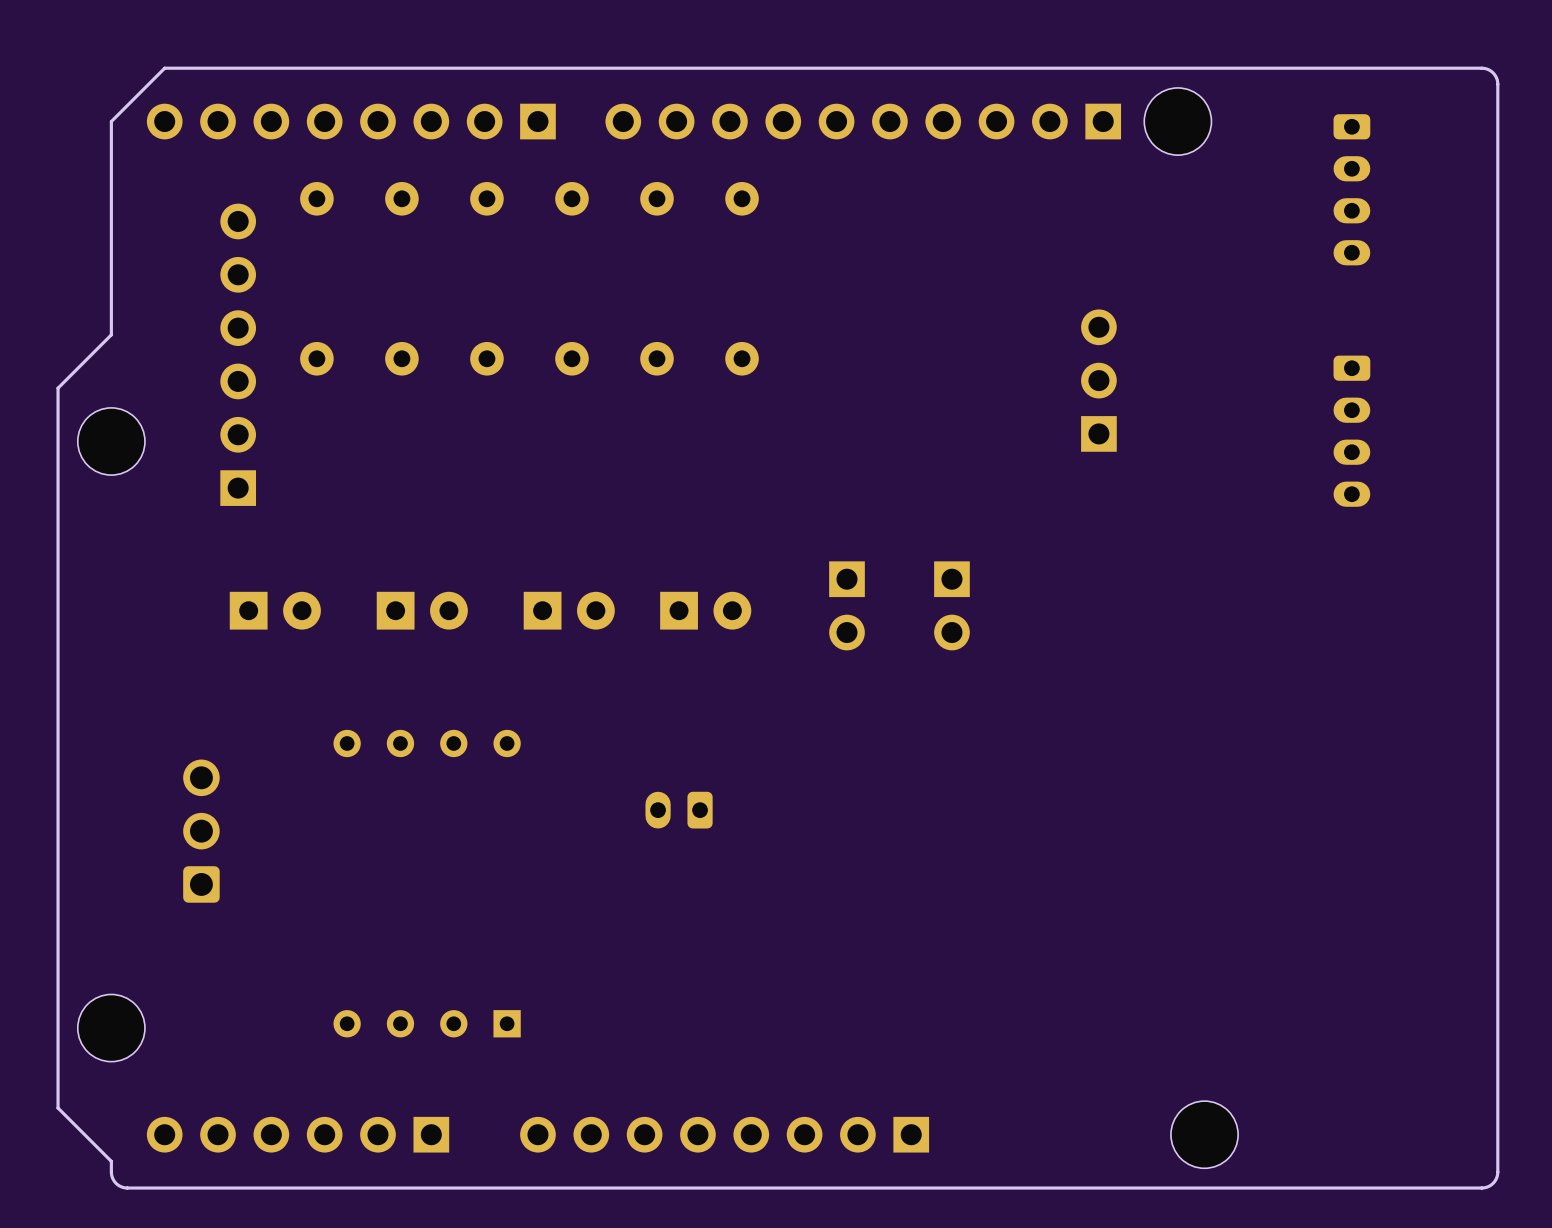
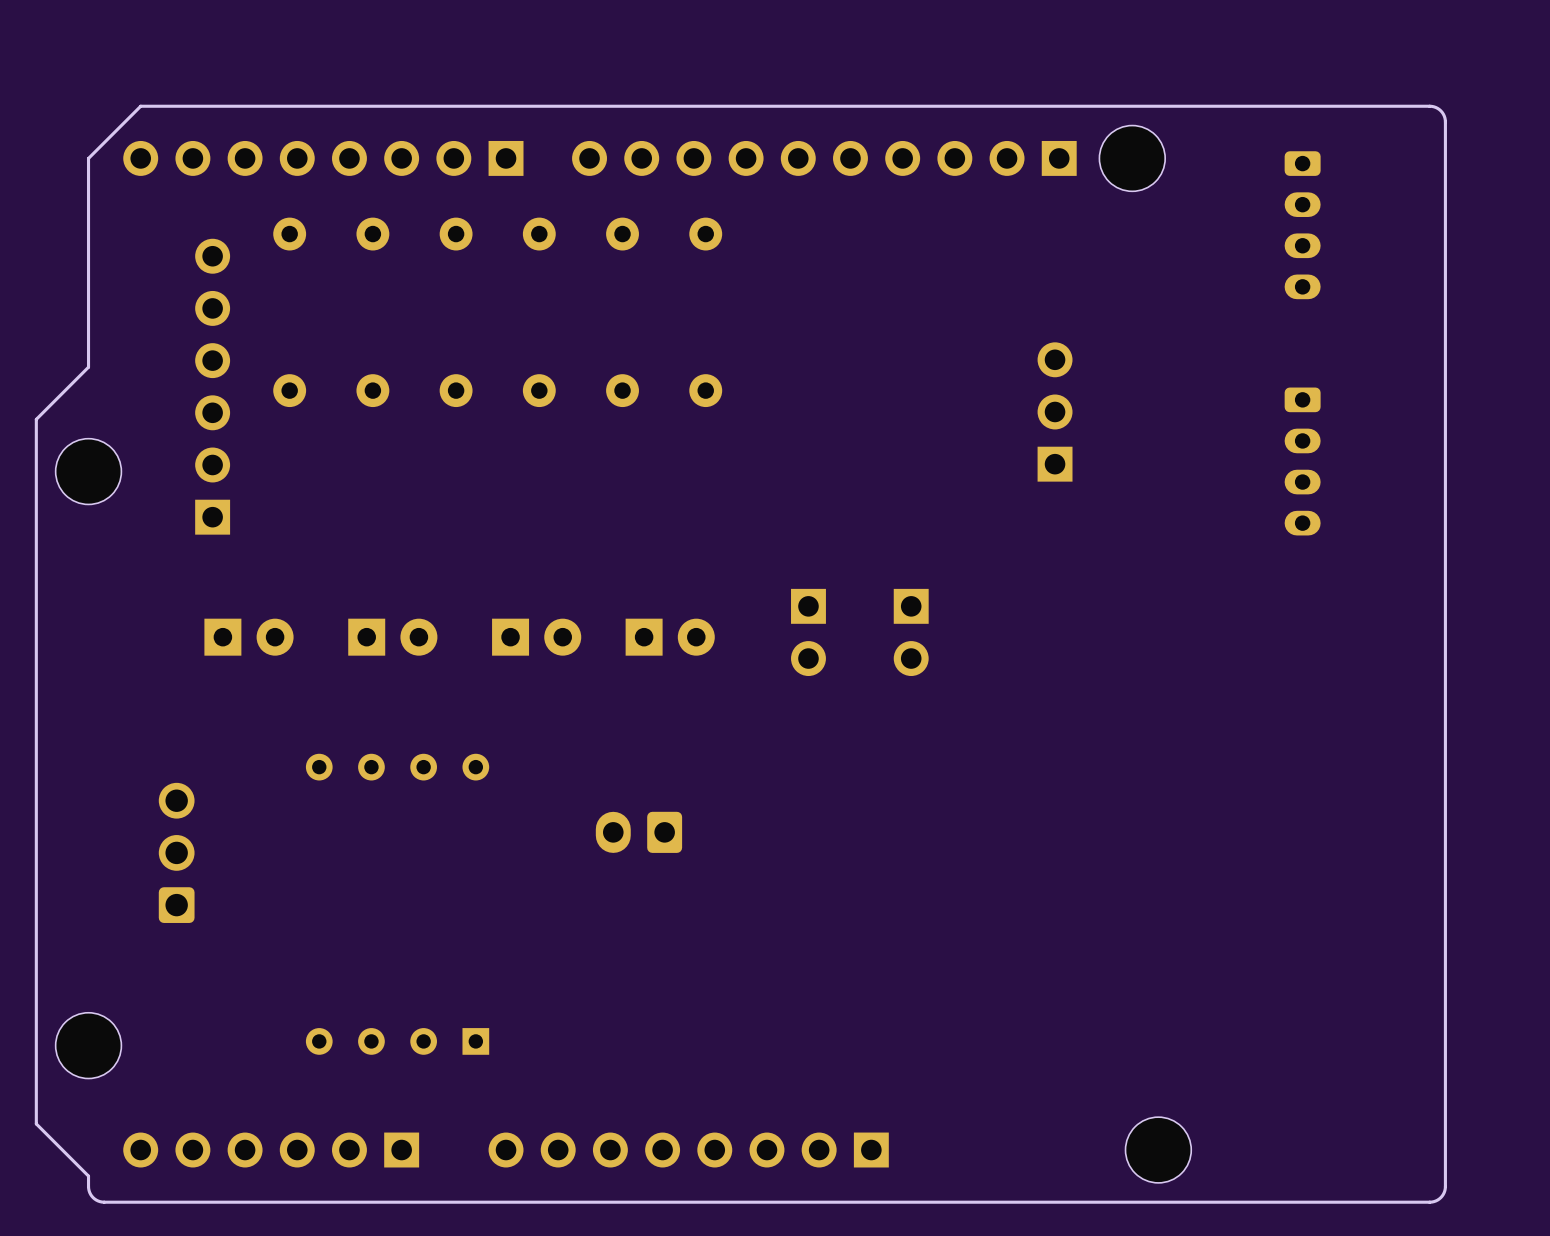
part footprint: [645, 791, 713, 829] -> [595, 811, 683, 853]

